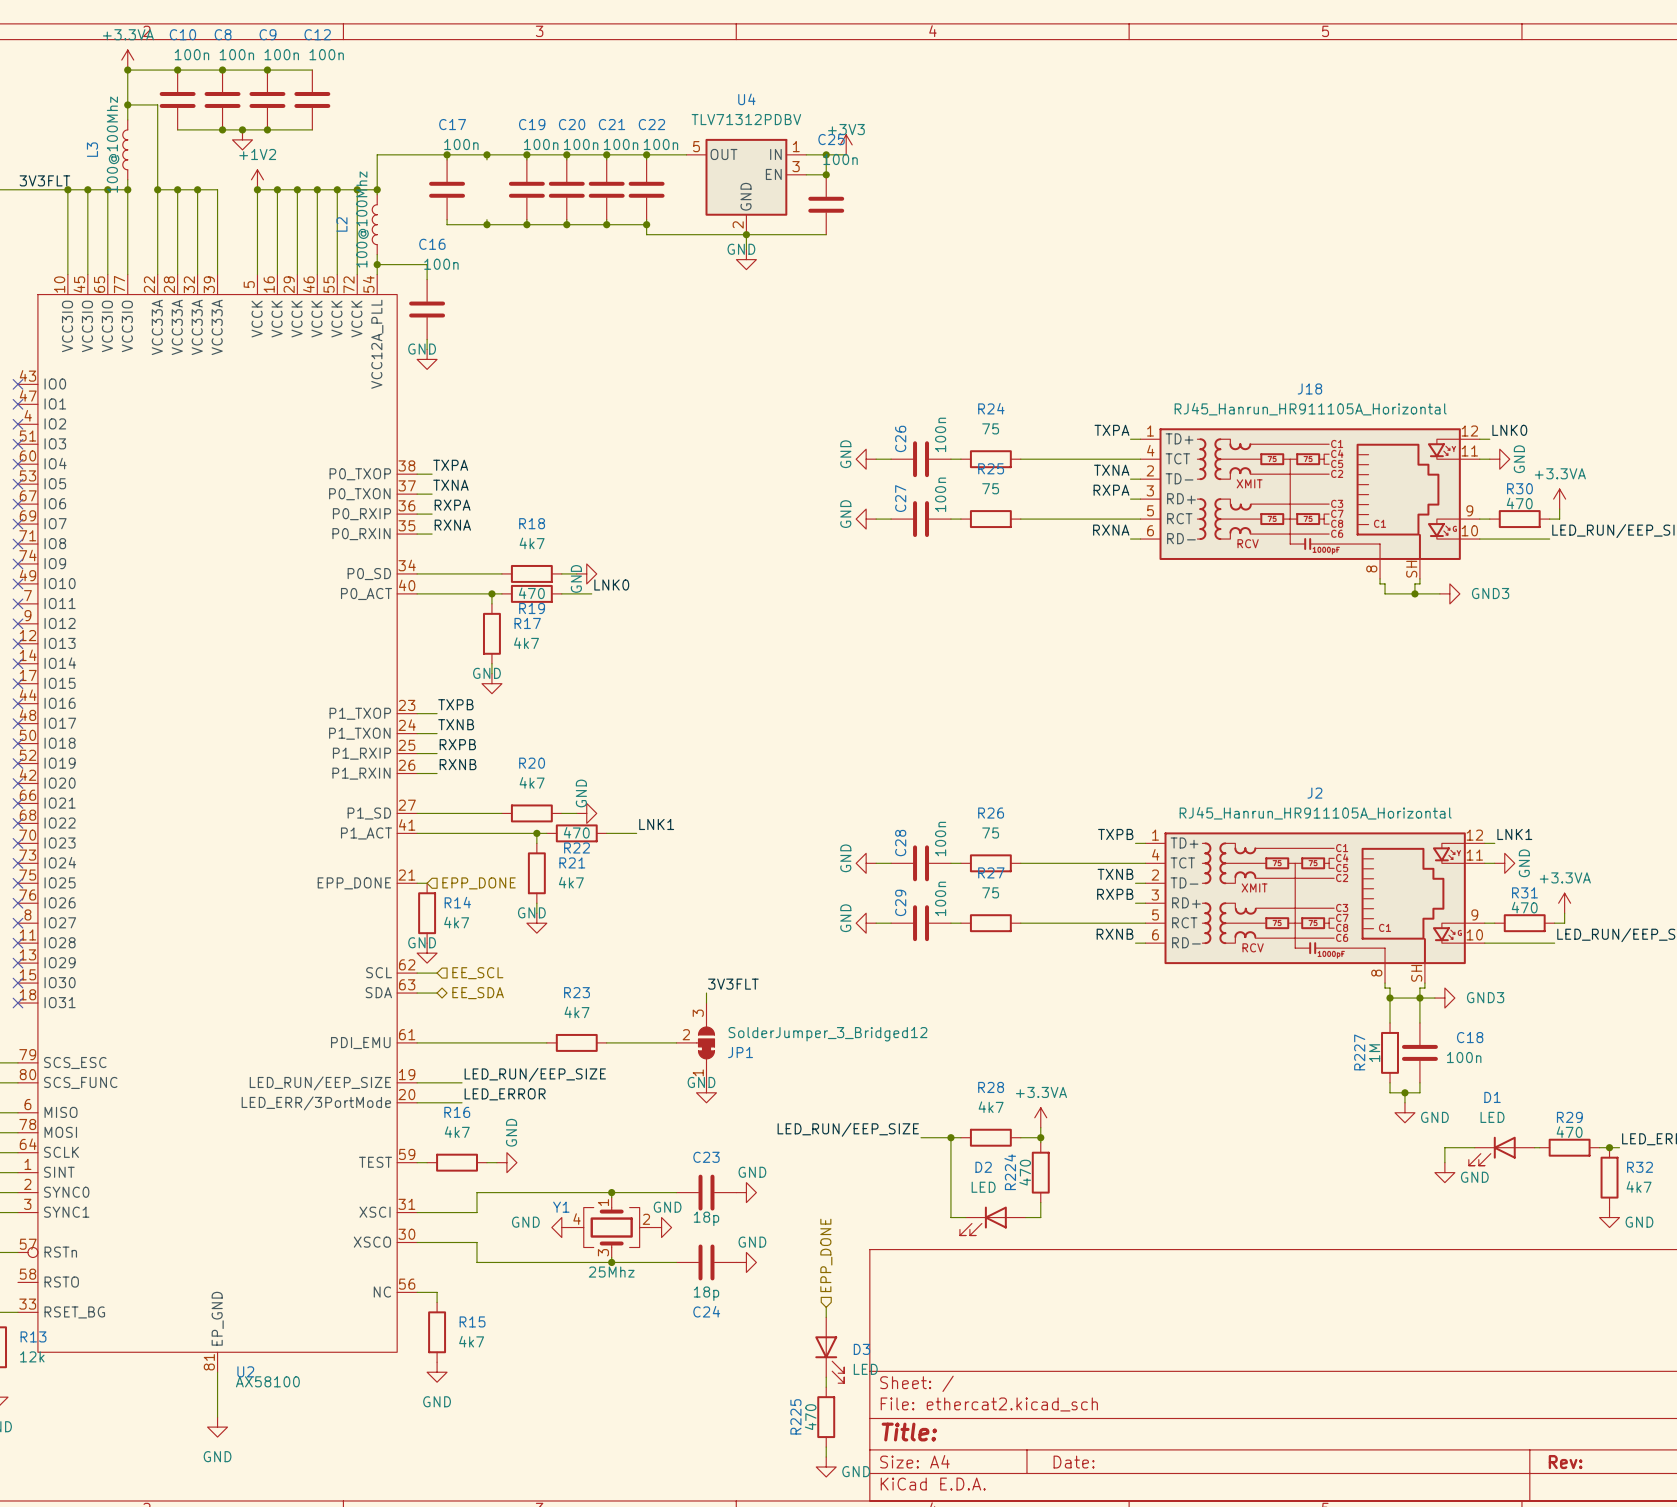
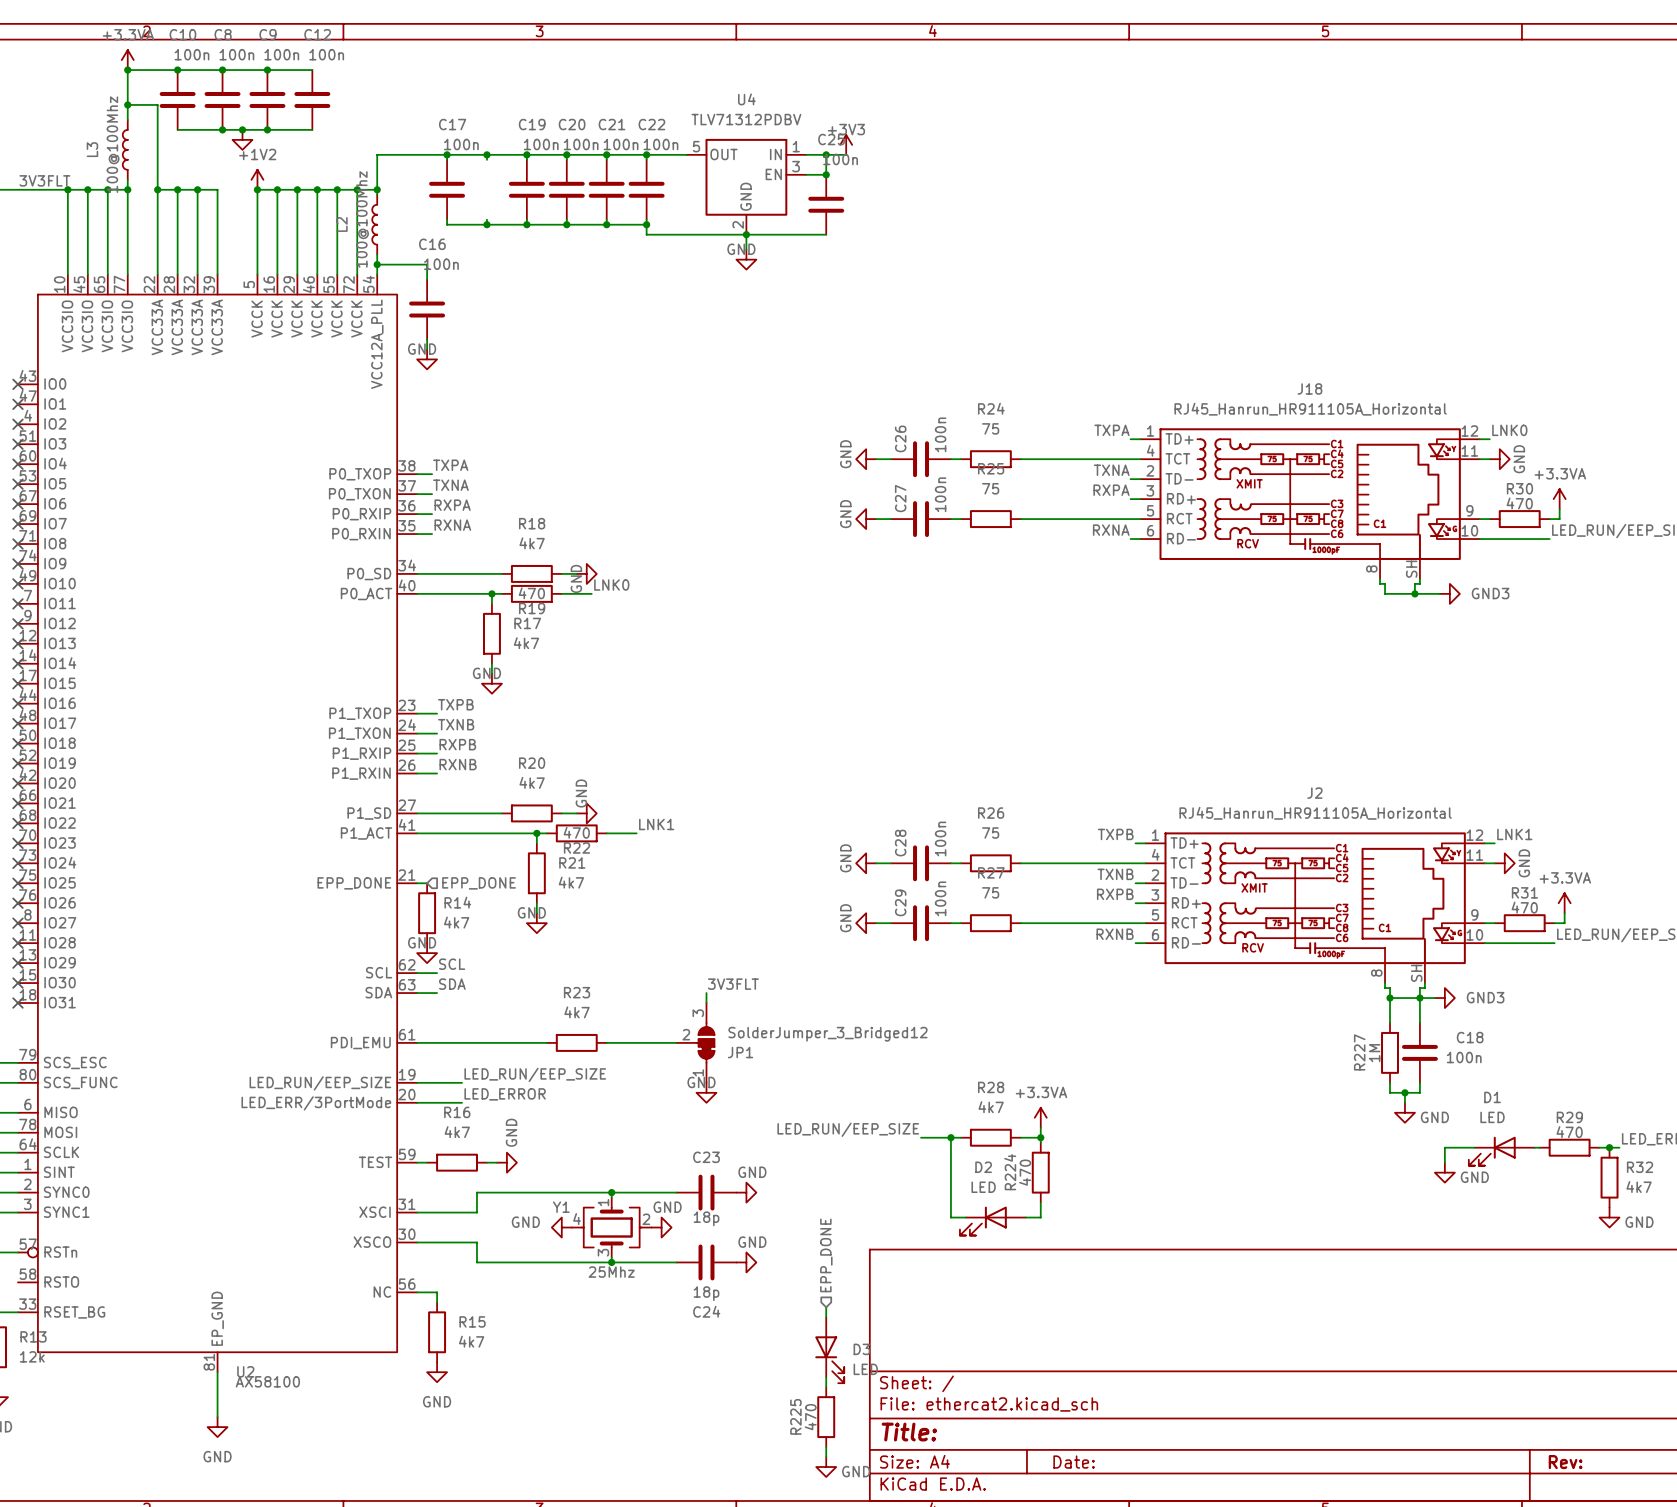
label: none -> SCL (452, 964)
hierarchical label: EE_SCL (477, 973) -> none
label: none -> SDA (452, 984)
hierarchical label: EE_SDA (478, 993) -> none

